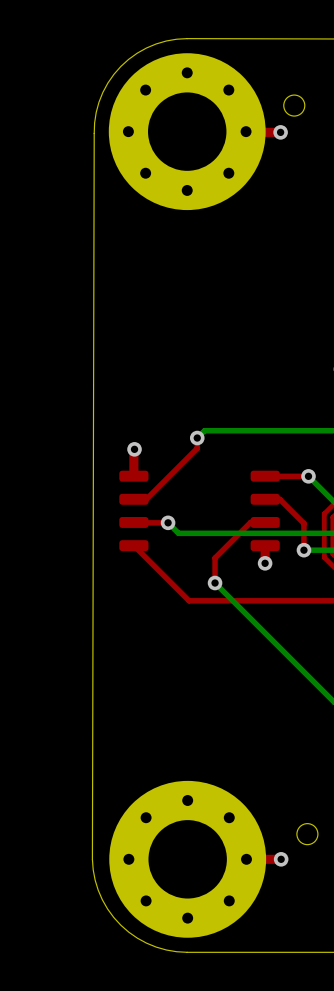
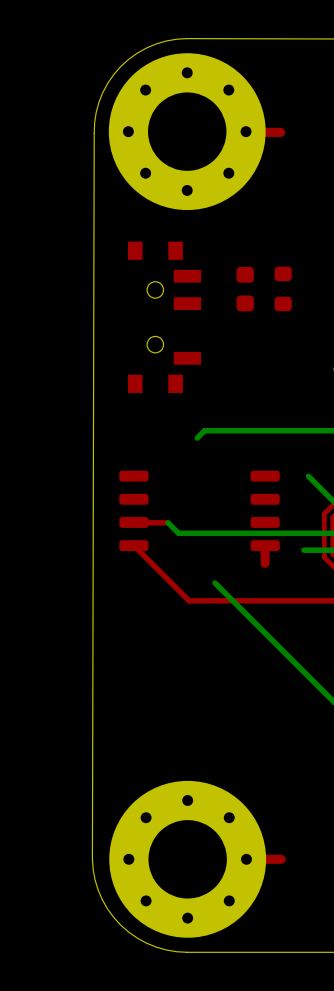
round board edge: [283, 94, 306, 117] -> none
via: (280, 132) -> none
part: none -> (283, 288)
part: none -> (245, 289)
part: none -> (164, 317)
top track: (197, 438) (197, 448) (146, 499) (133, 499) -> none
via: (197, 438) -> none
top track: (134, 449) (133, 476) -> none
via: (134, 449) -> none
top track: (308, 476) (265, 476) -> none
via: (308, 476) -> none
top track: (265, 499) (279, 499) (303, 523) (303, 550) -> none
via: (168, 522) -> none
top track: (265, 522) (250, 522) (215, 558) (215, 583) -> none
via: (303, 550) -> none
via: (265, 563) -> none
via: (215, 583) -> none
round board edge: [296, 823, 319, 846] -> none
via: (281, 859) -> none

